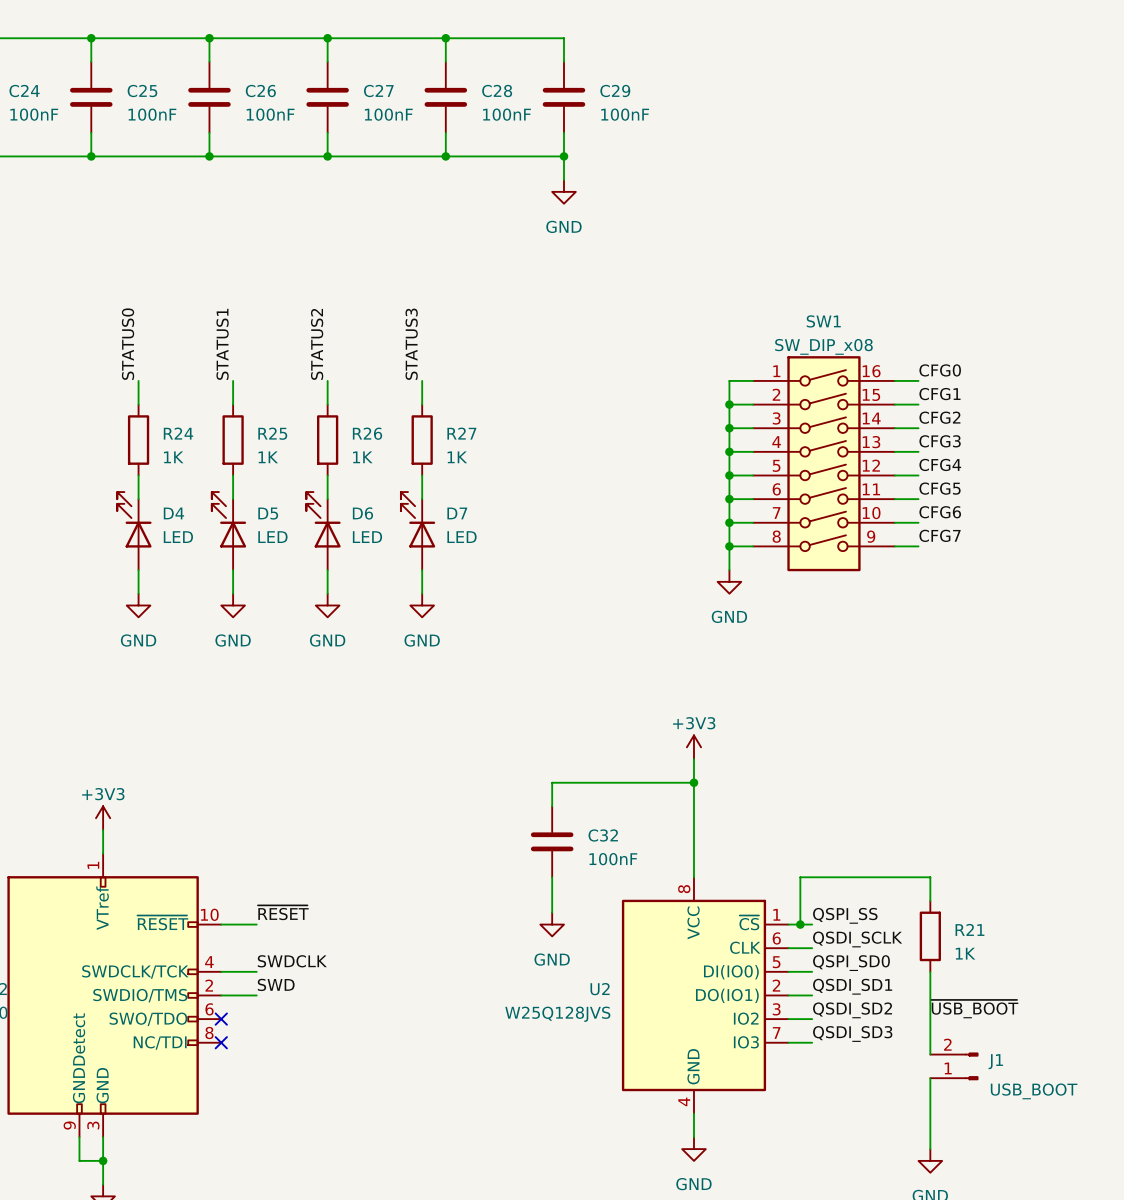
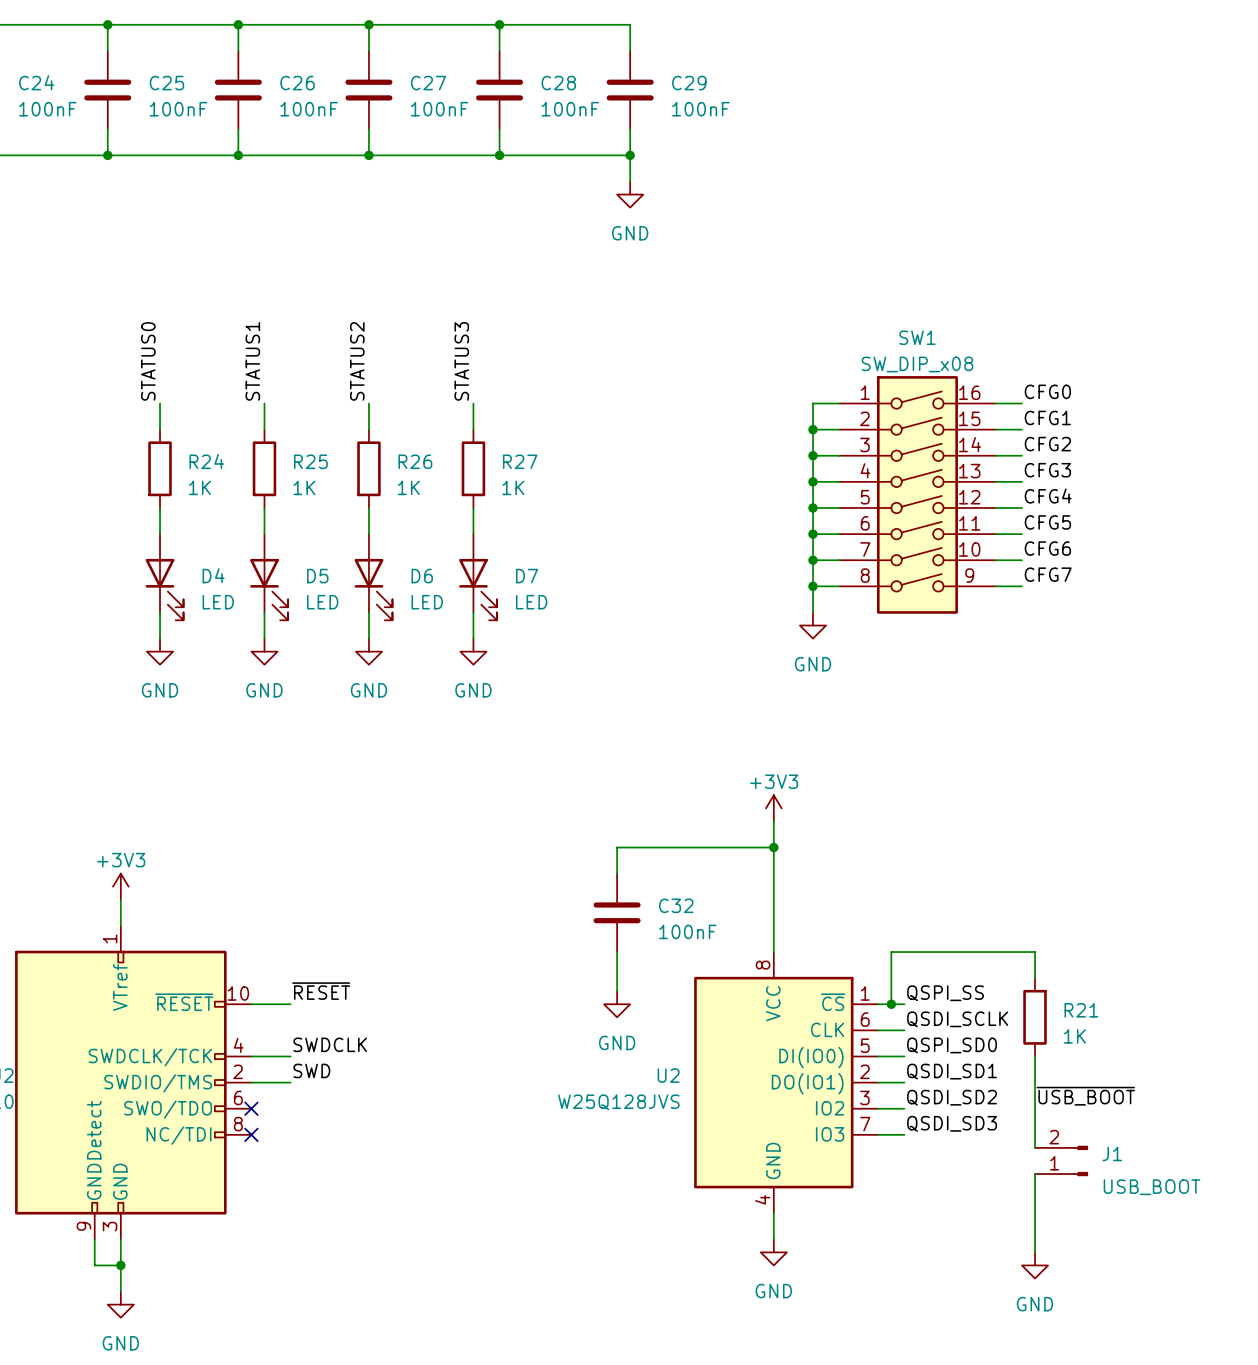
D4 rotation: 0° (134, 519) -> 180° (164, 589)
D5 rotation: 0° (228, 519) -> 180° (269, 589)
D6 rotation: 0° (323, 519) -> 180° (373, 589)
D7 rotation: 0° (418, 519) -> 180° (478, 589)

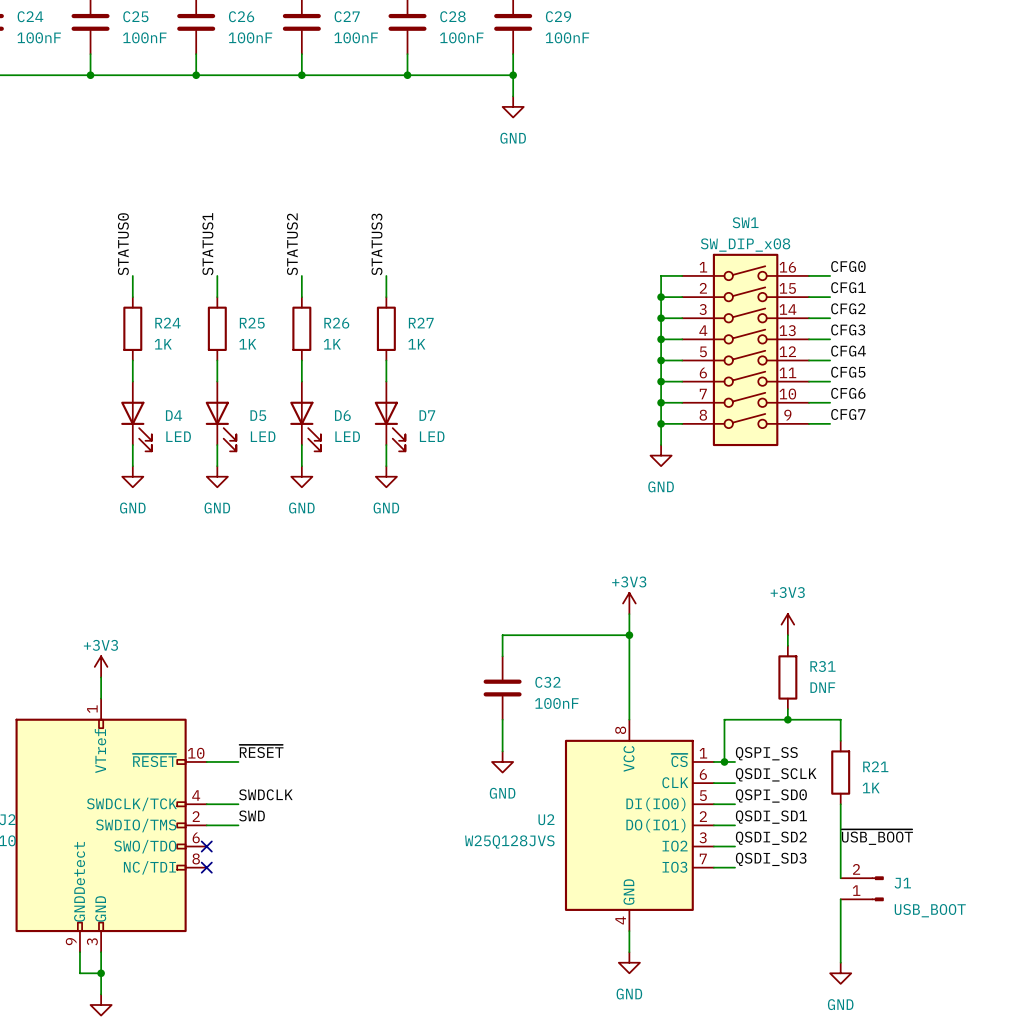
power symbol: none -> +3V3 (787, 624)
wire: none -> (787, 635) (787, 645)
R31: none -> DNF (787, 677)
wire: none -> (787, 709) (787, 719)
junction: none -> (787, 719)

